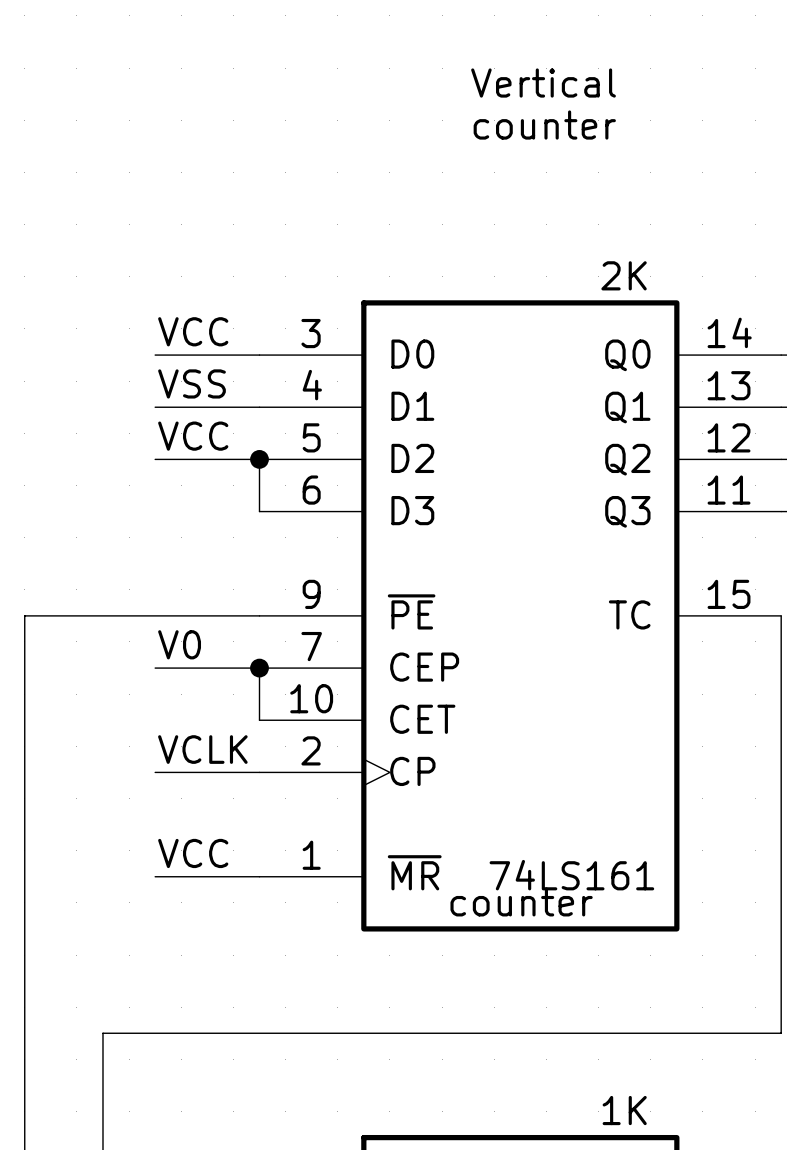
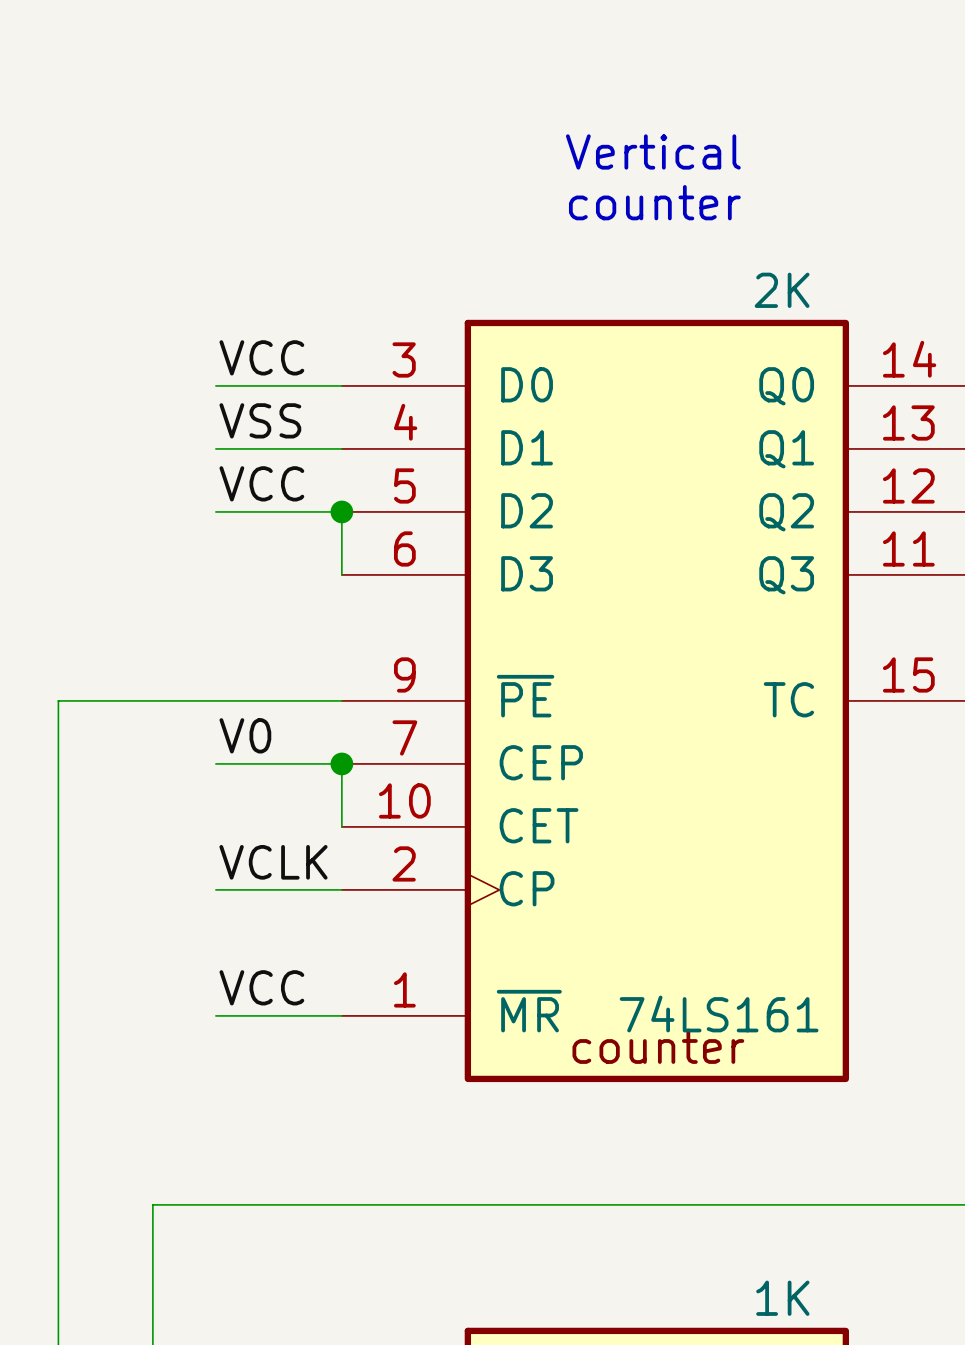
text position: Vertical (543, 83) -> Vertical (653, 151)
text position: counter (544, 125) -> counter (654, 202)

